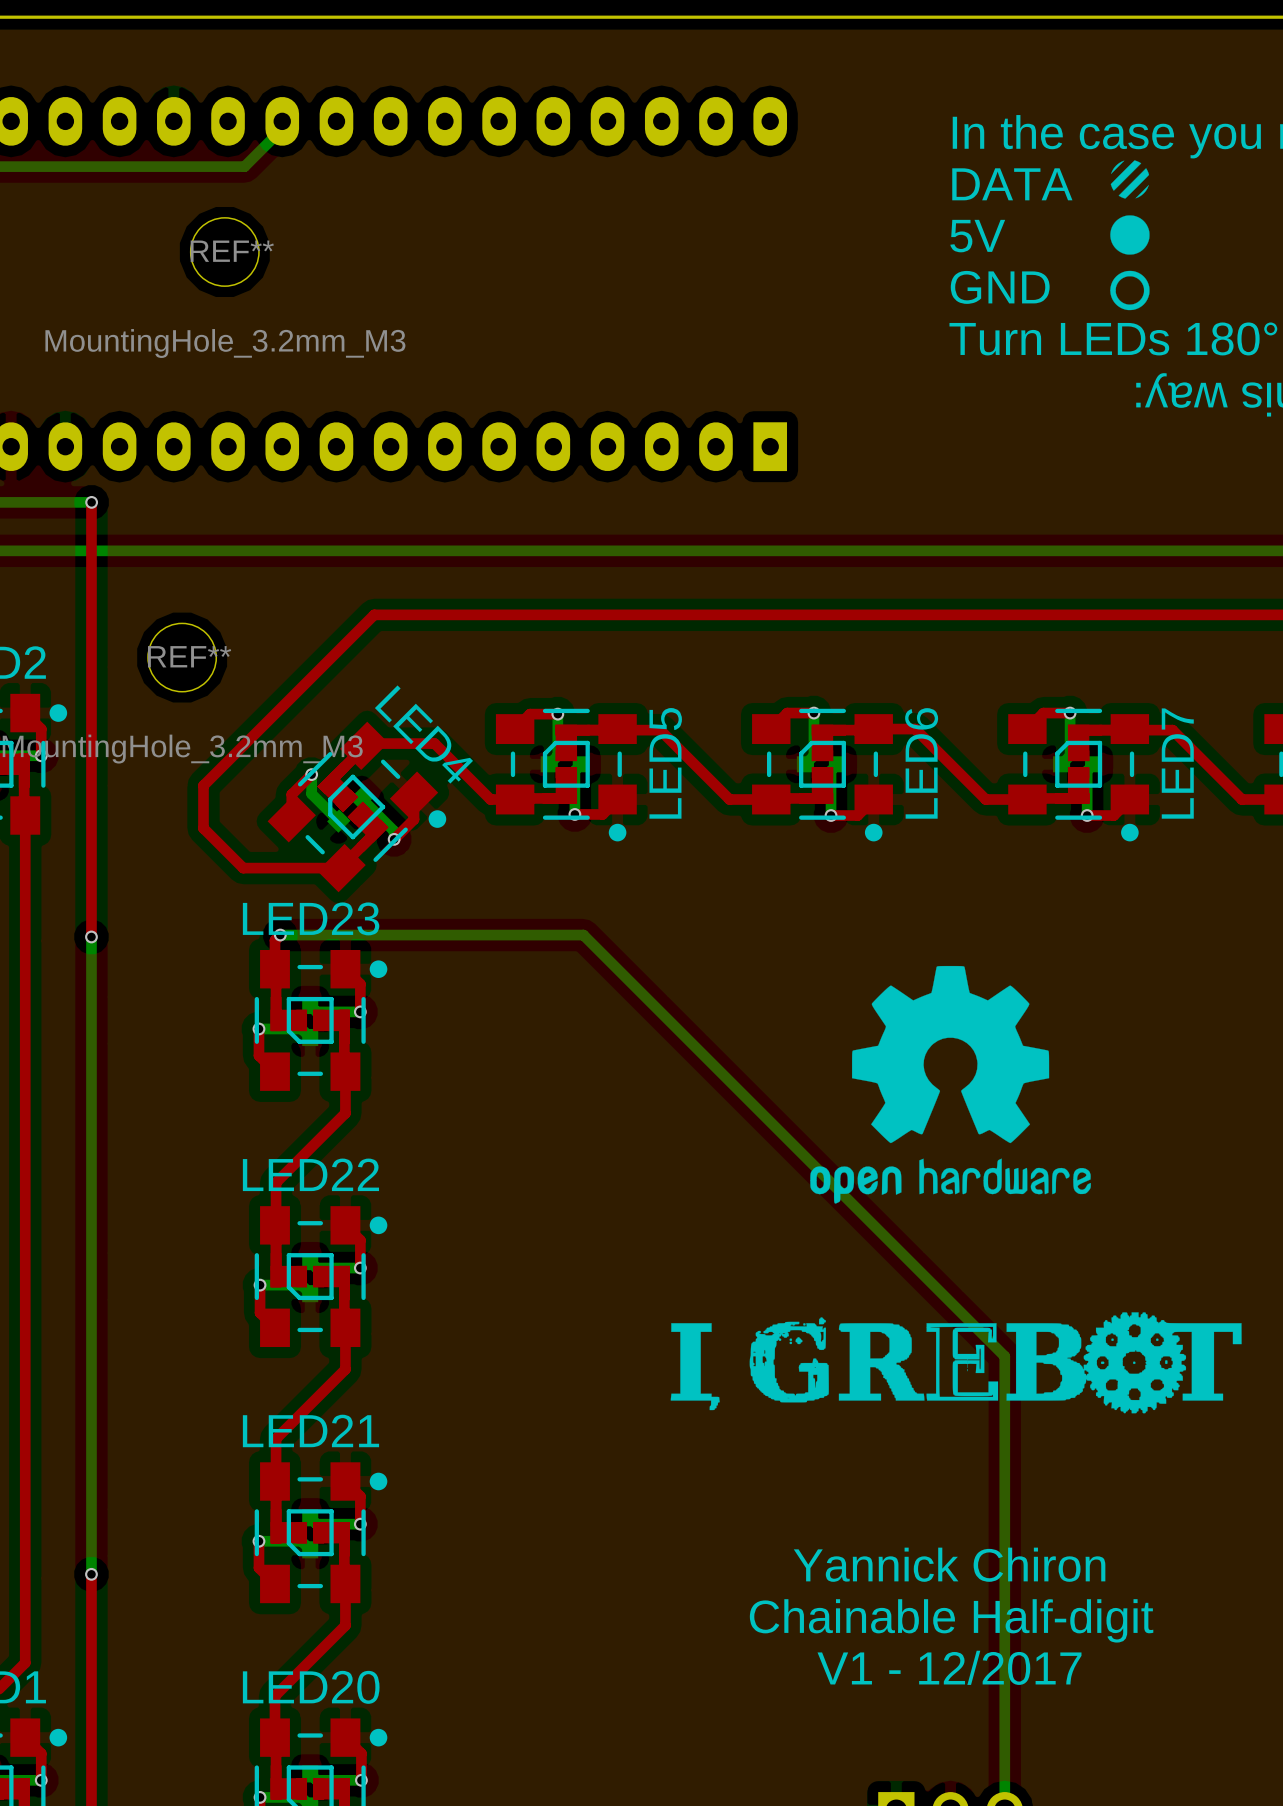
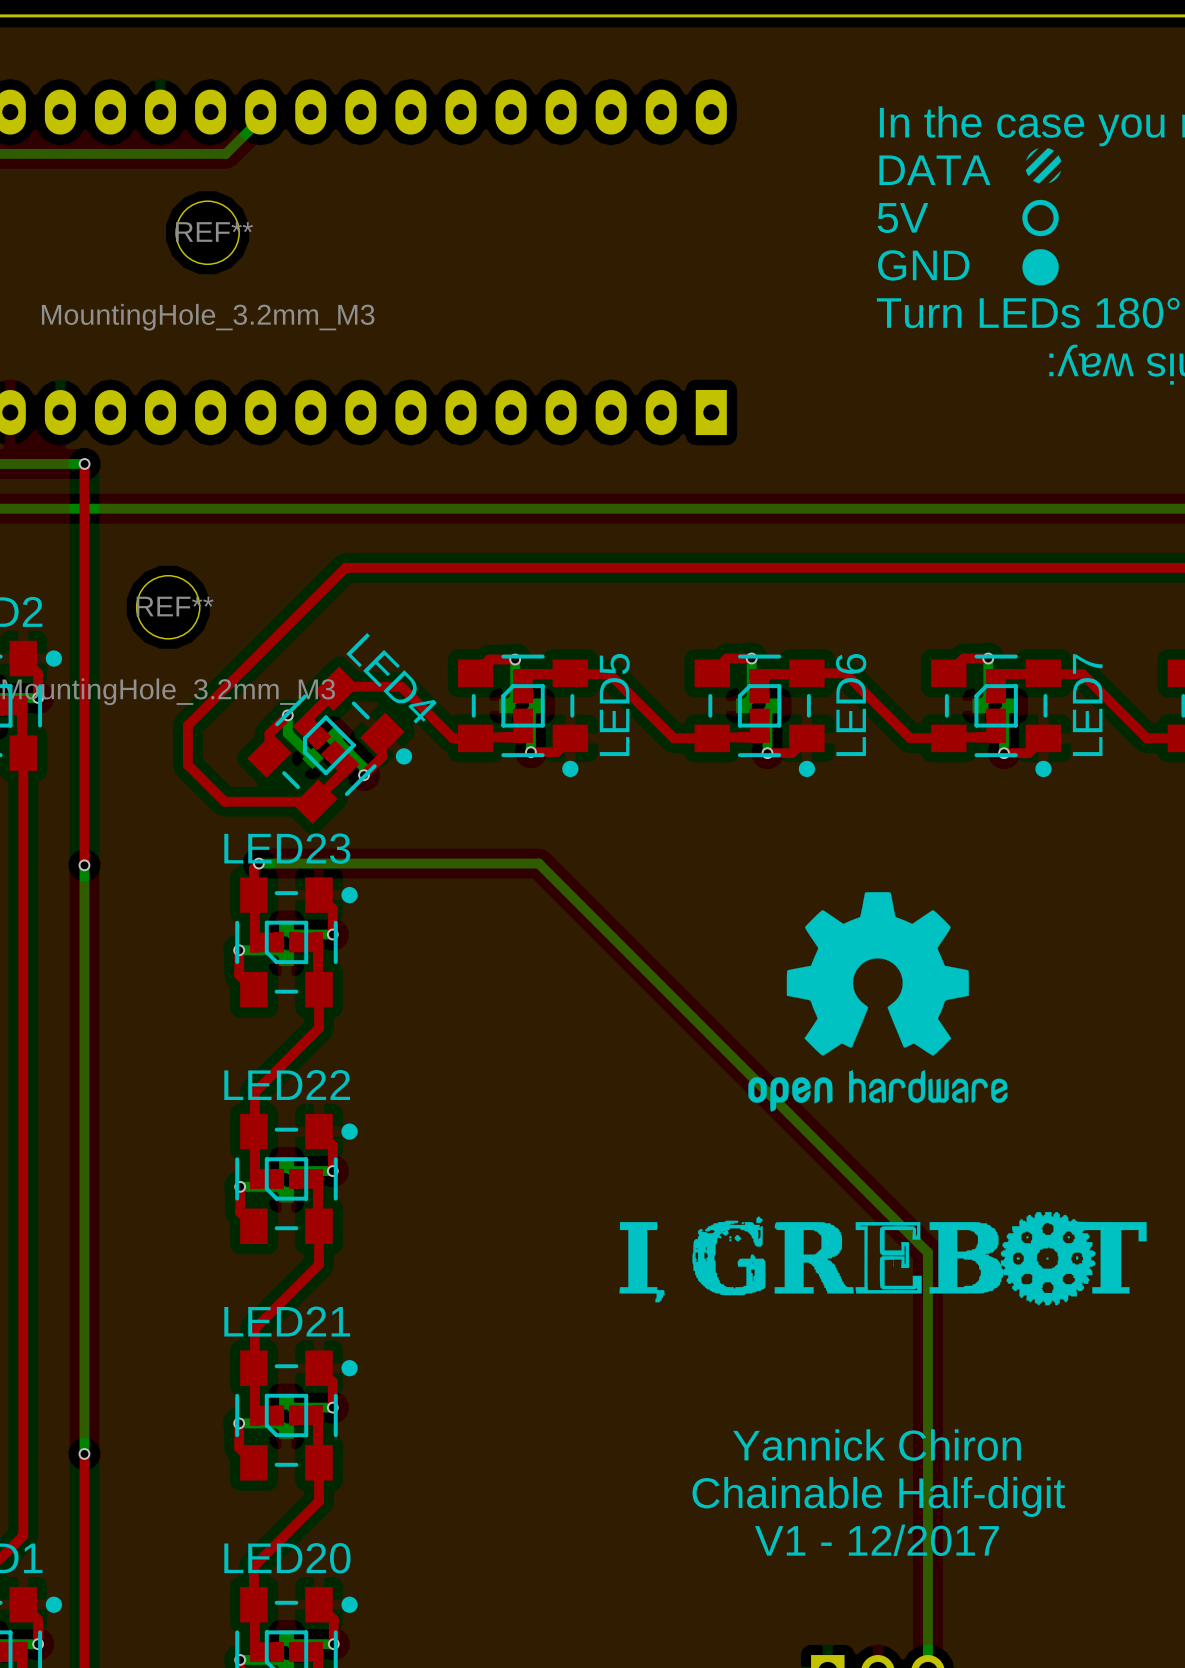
drawing position: (1129, 235) -> (1040, 267)
drawing position: (1129, 290) -> (1040, 218)

